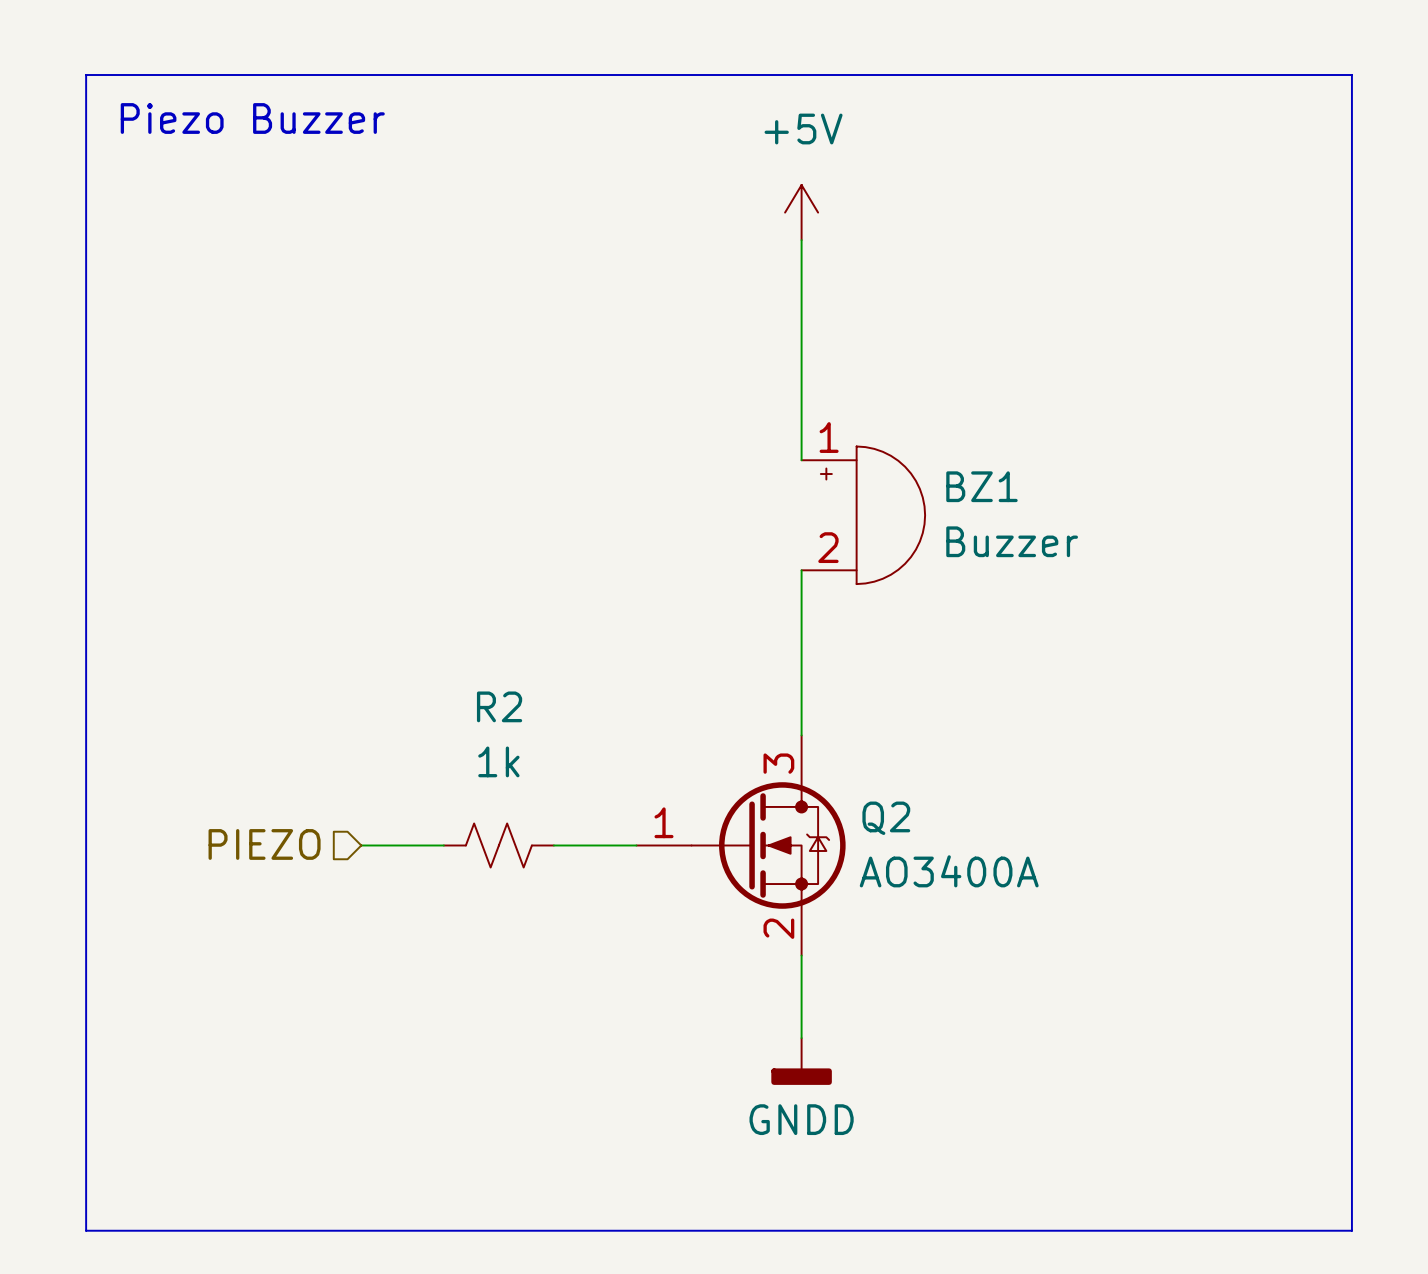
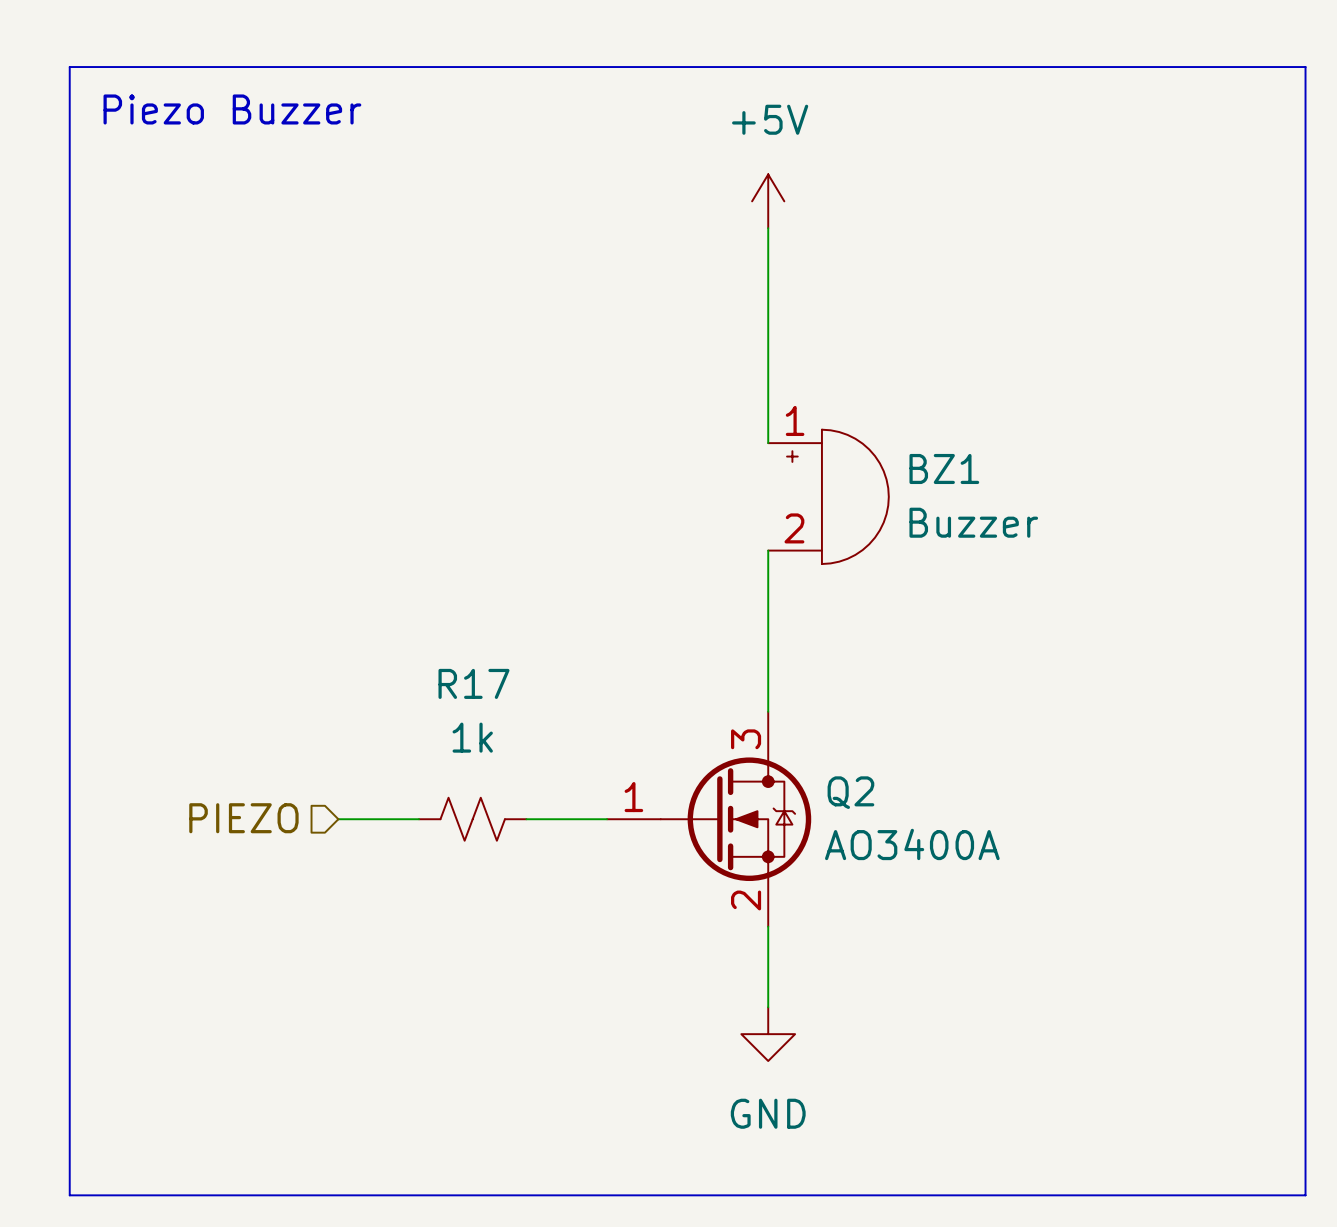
R2 name: R2 (499, 706) -> R17 (473, 683)
power symbol: GNDD (801, 1061) -> GND (768, 1034)

